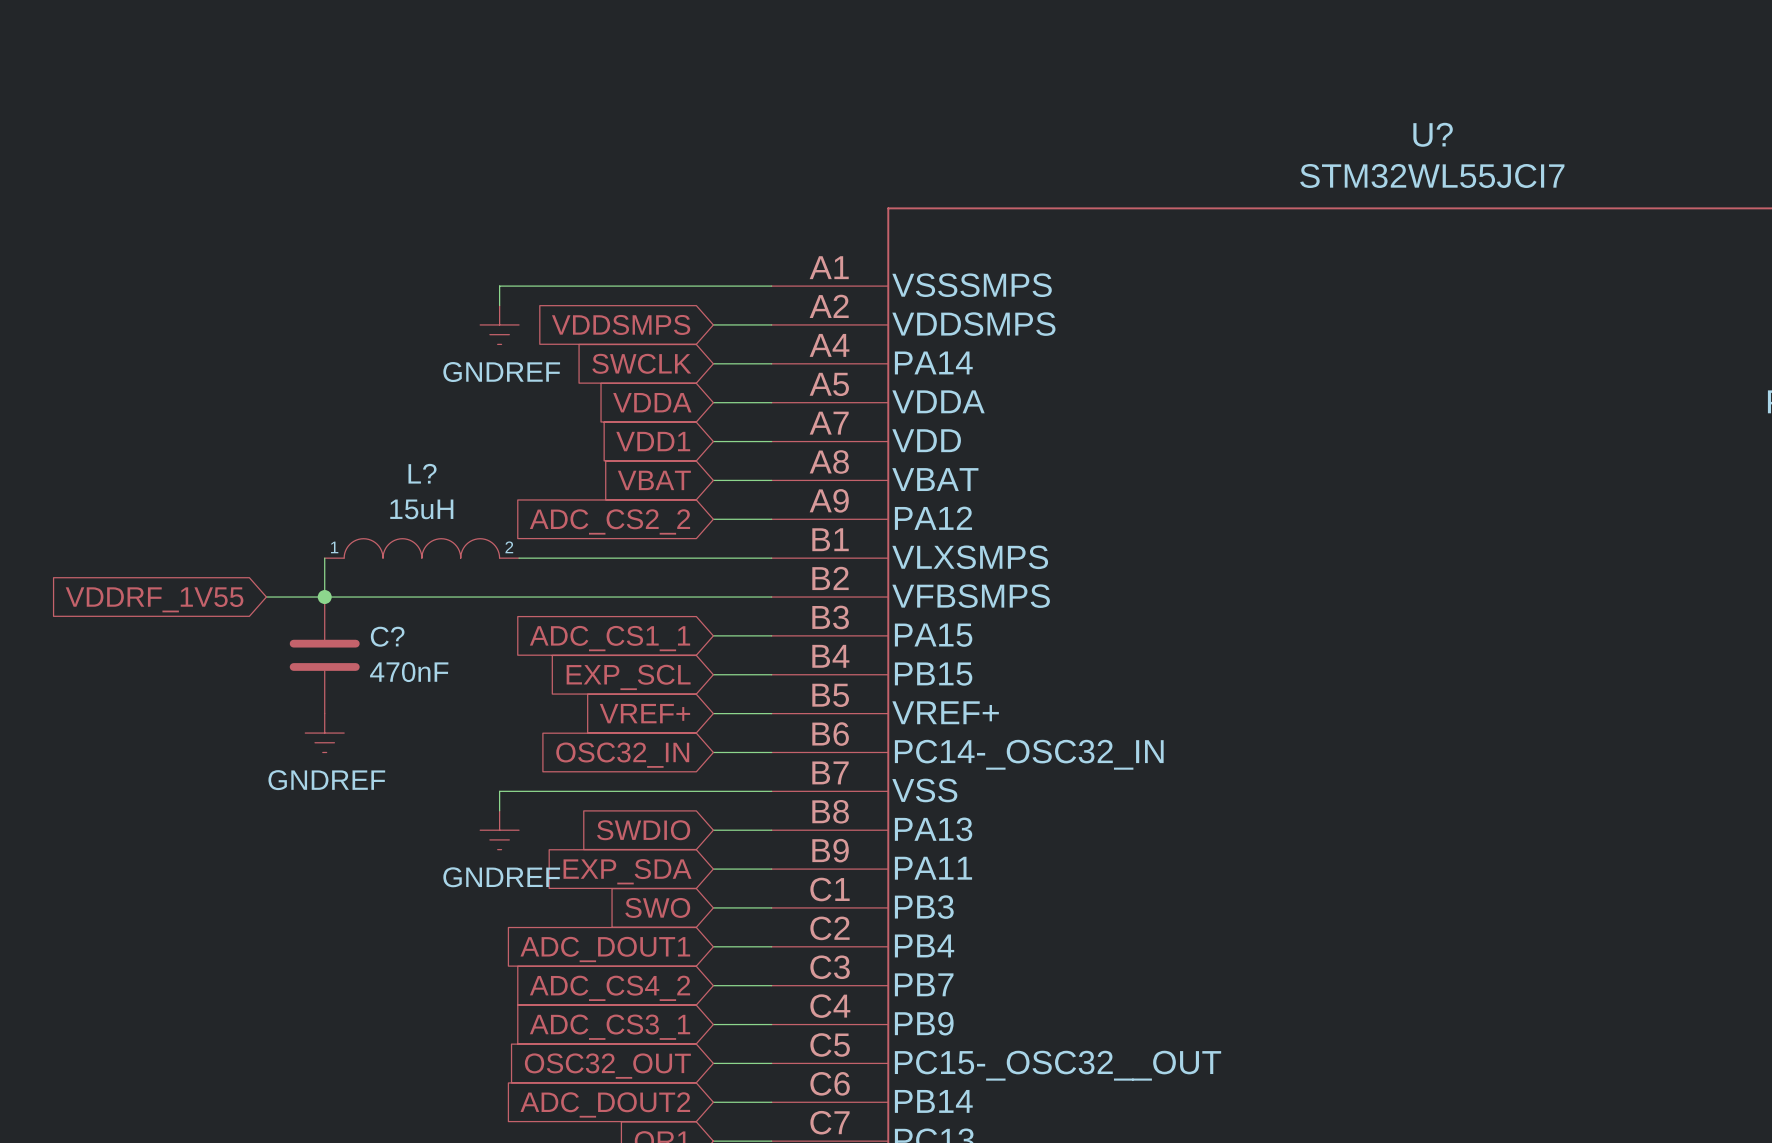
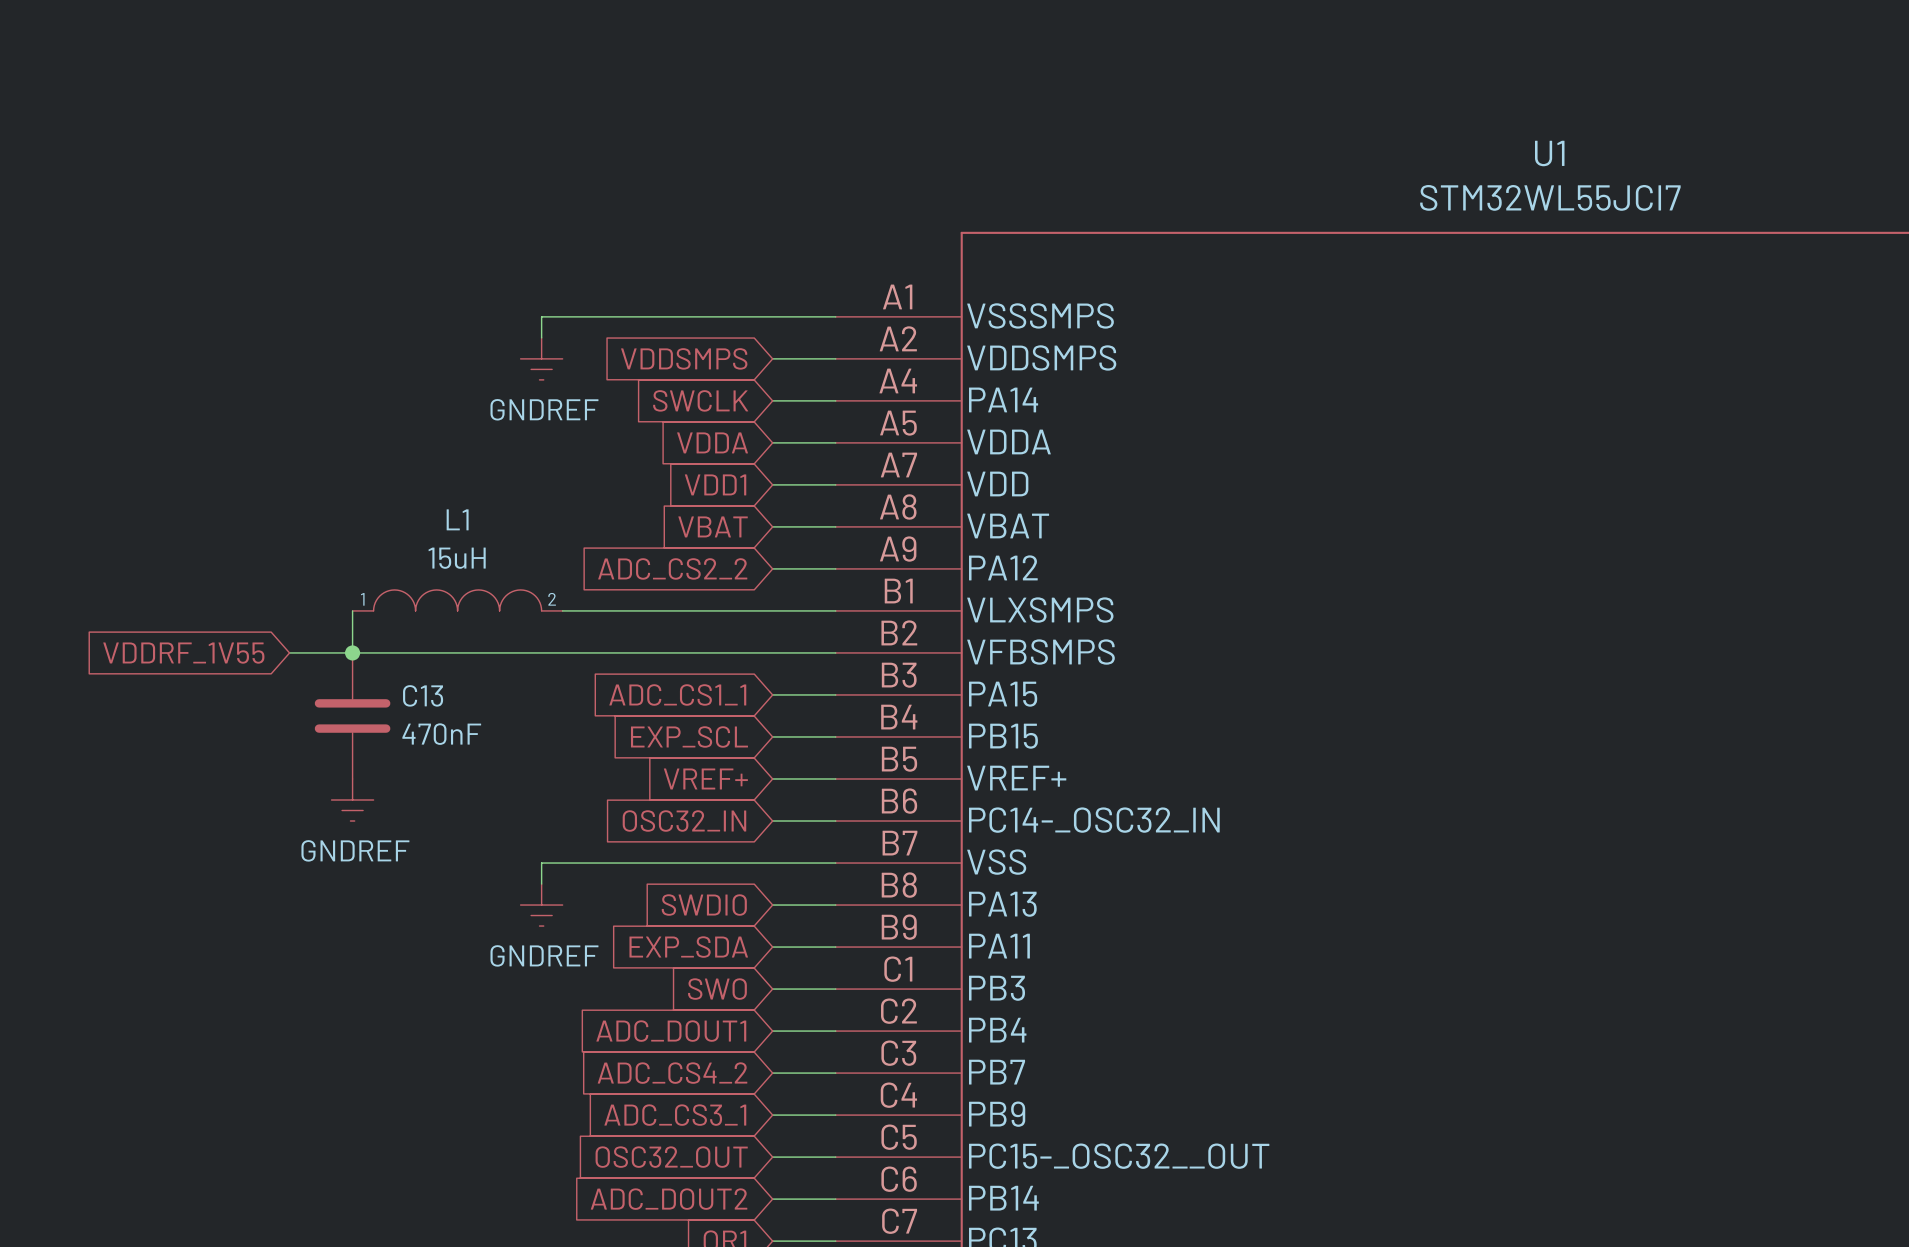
U? name: U? (1433, 134) -> U1 (1549, 153)
L? name: L? (422, 473) -> L1 (457, 519)
C? name: C? (387, 636) -> C13 (423, 695)

